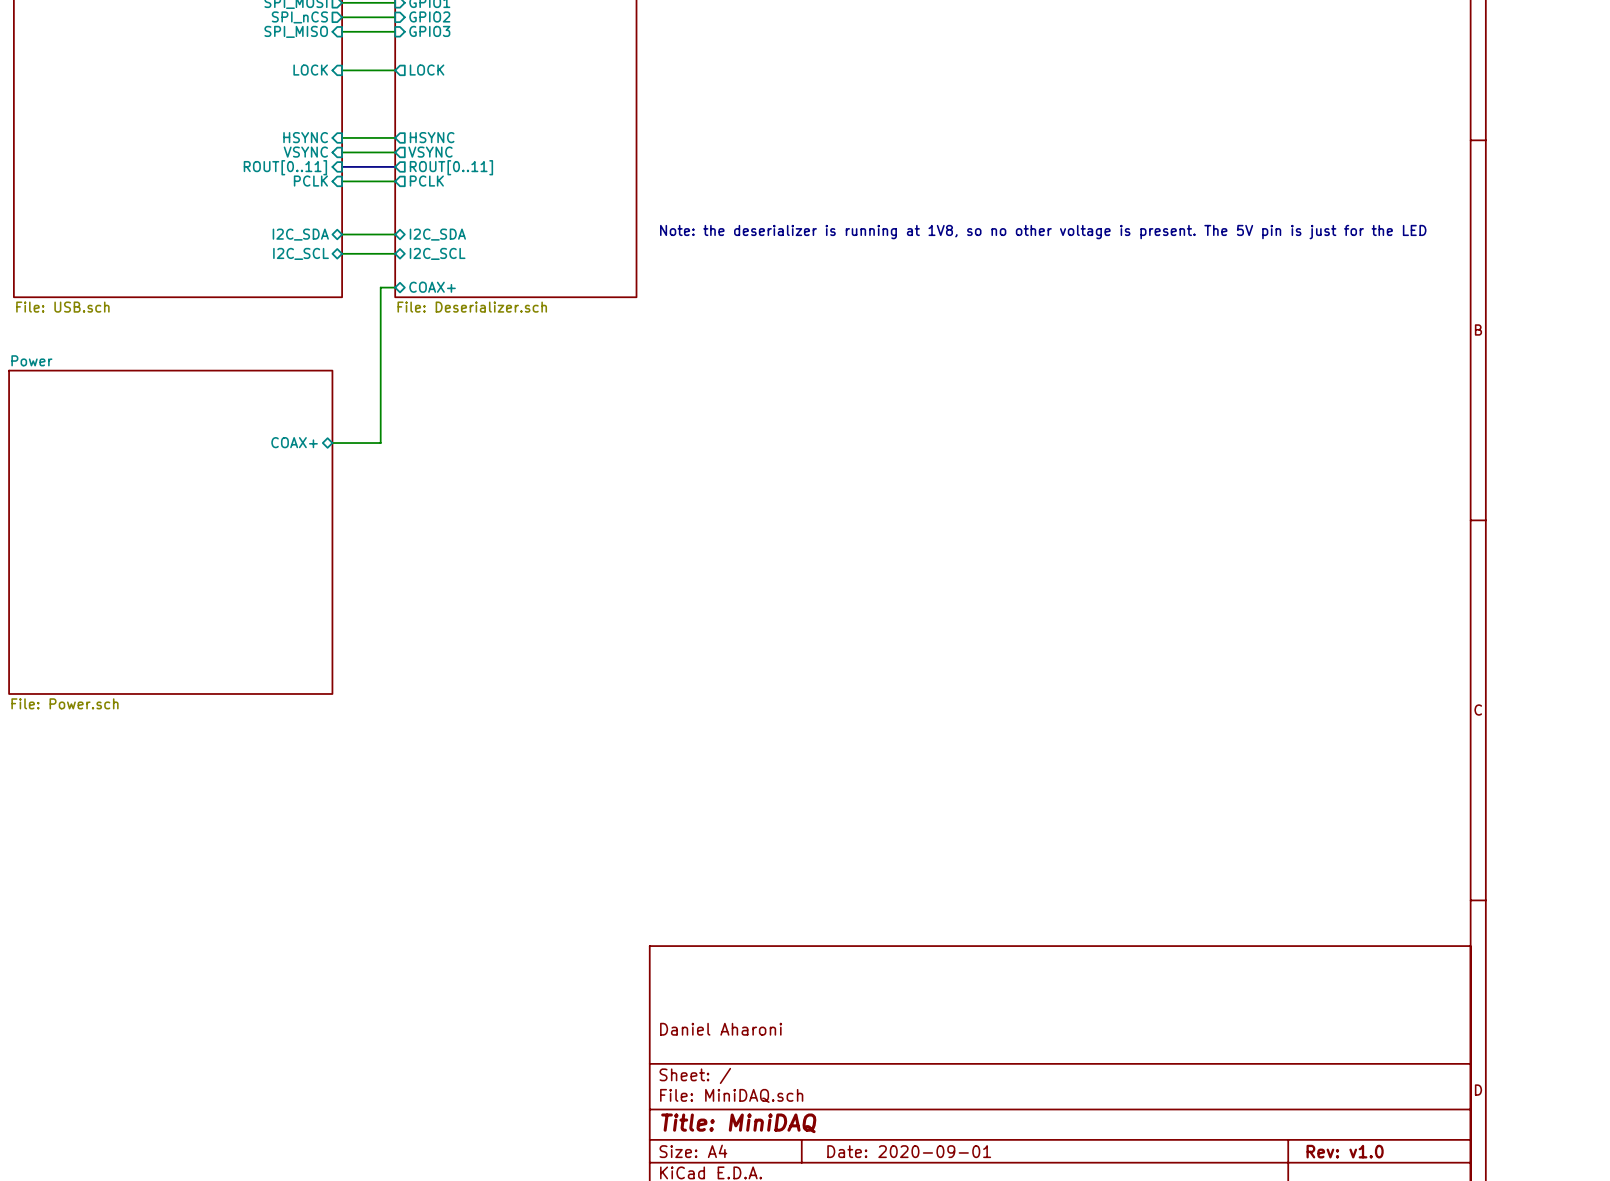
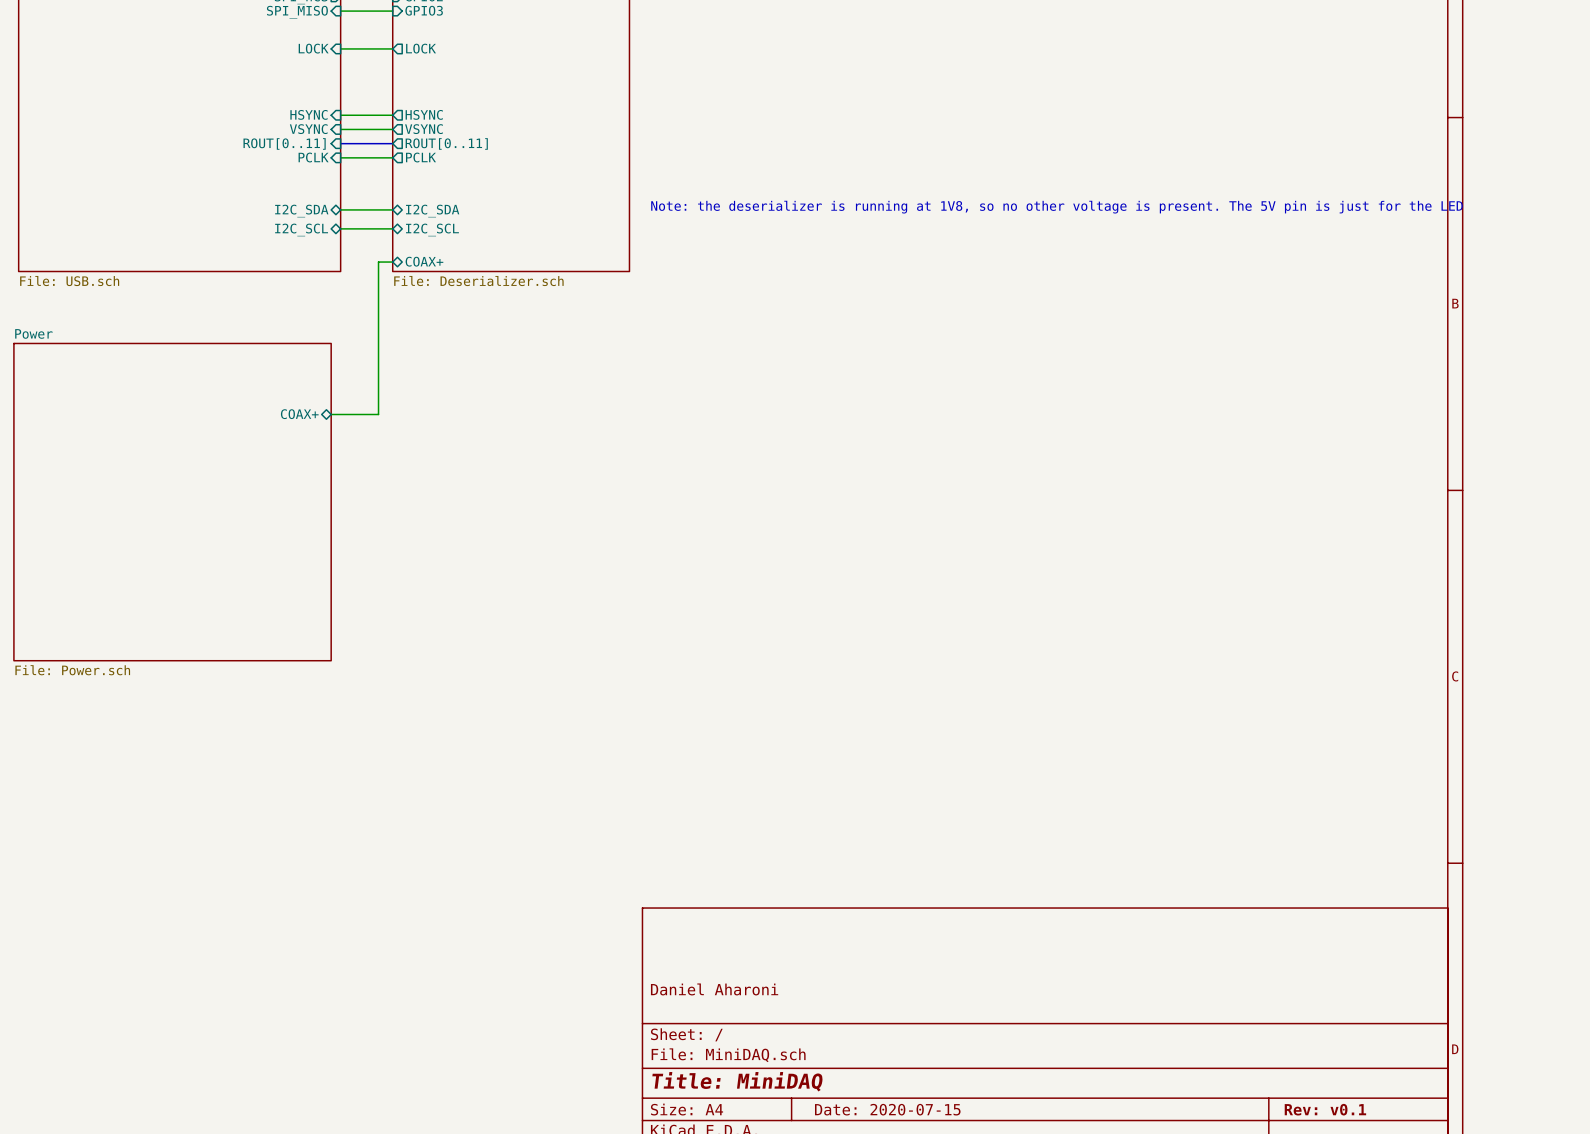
title block: Date: 2020-09-01 (909, 1151) -> Date: 2020-07-15 (887, 1109)
title block: Rev: v1.0 (1345, 1151) -> Rev: v0.1 (1325, 1109)

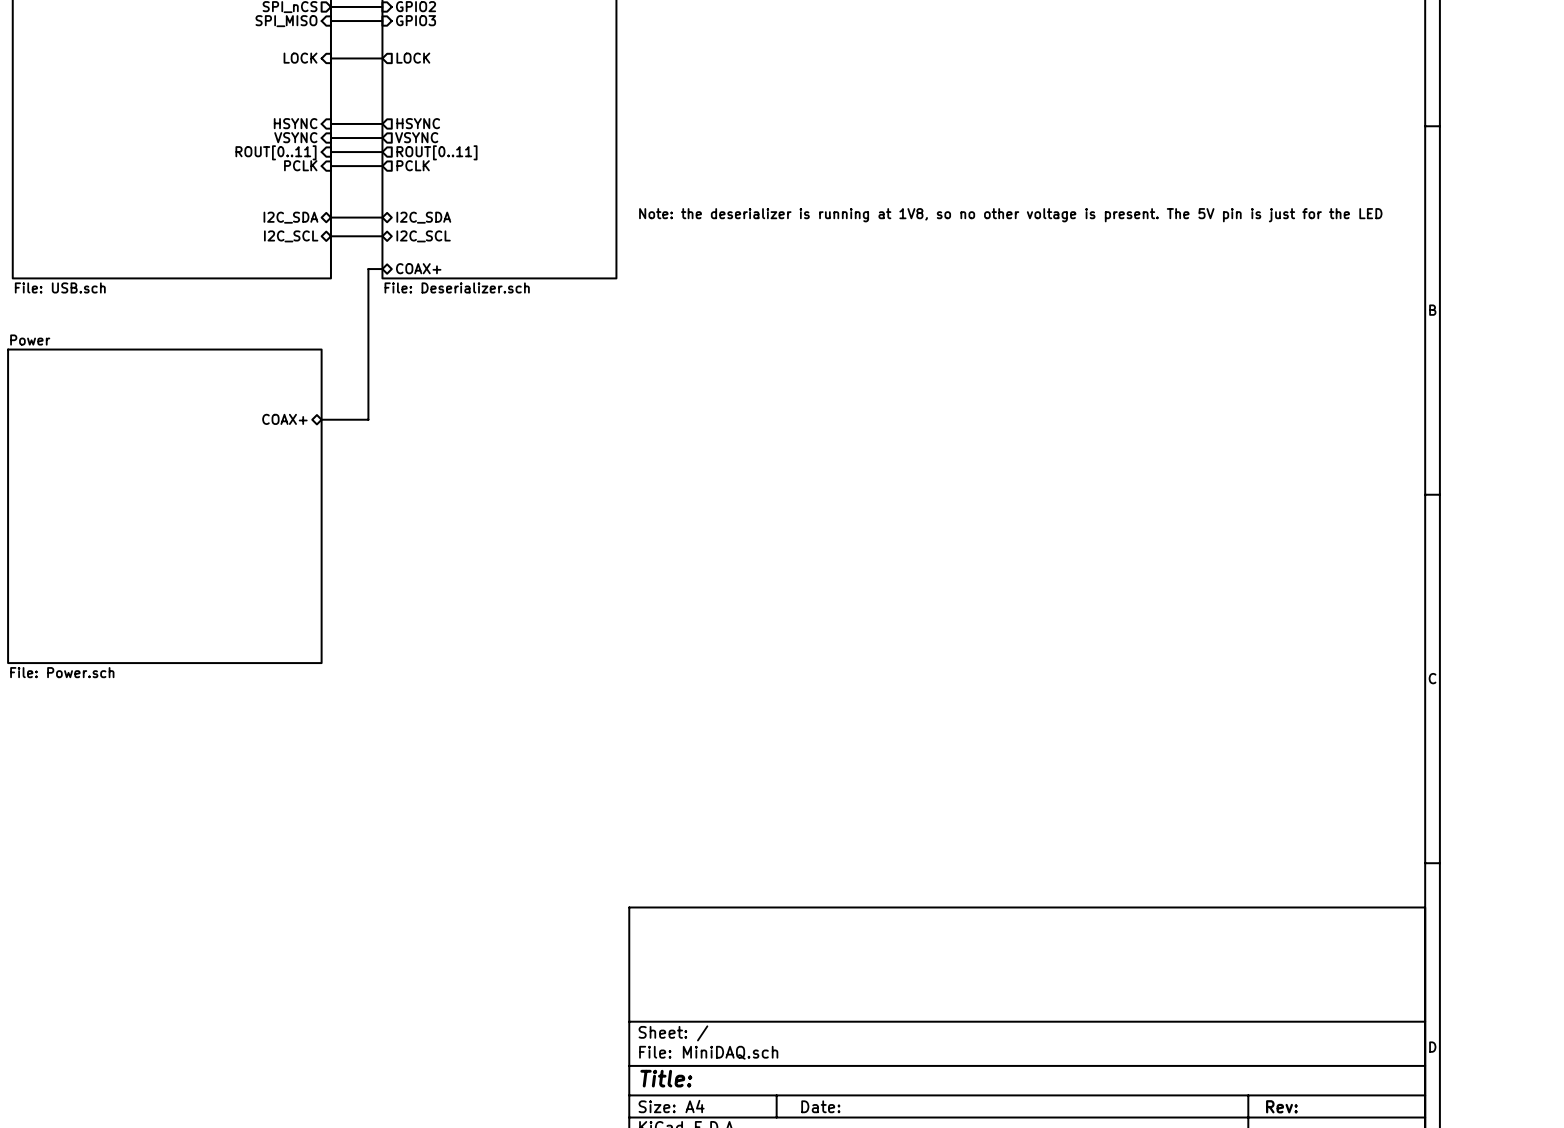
title block: Daniel Aharoni (714, 989) -> none
title block: Title: MiniDAQ (737, 1081) -> Title: (666, 1078)
title block: Date: 2020-07-15 (887, 1109) -> Date: (820, 1106)
title block: Rev: v0.1 (1325, 1109) -> Rev: (1281, 1106)

